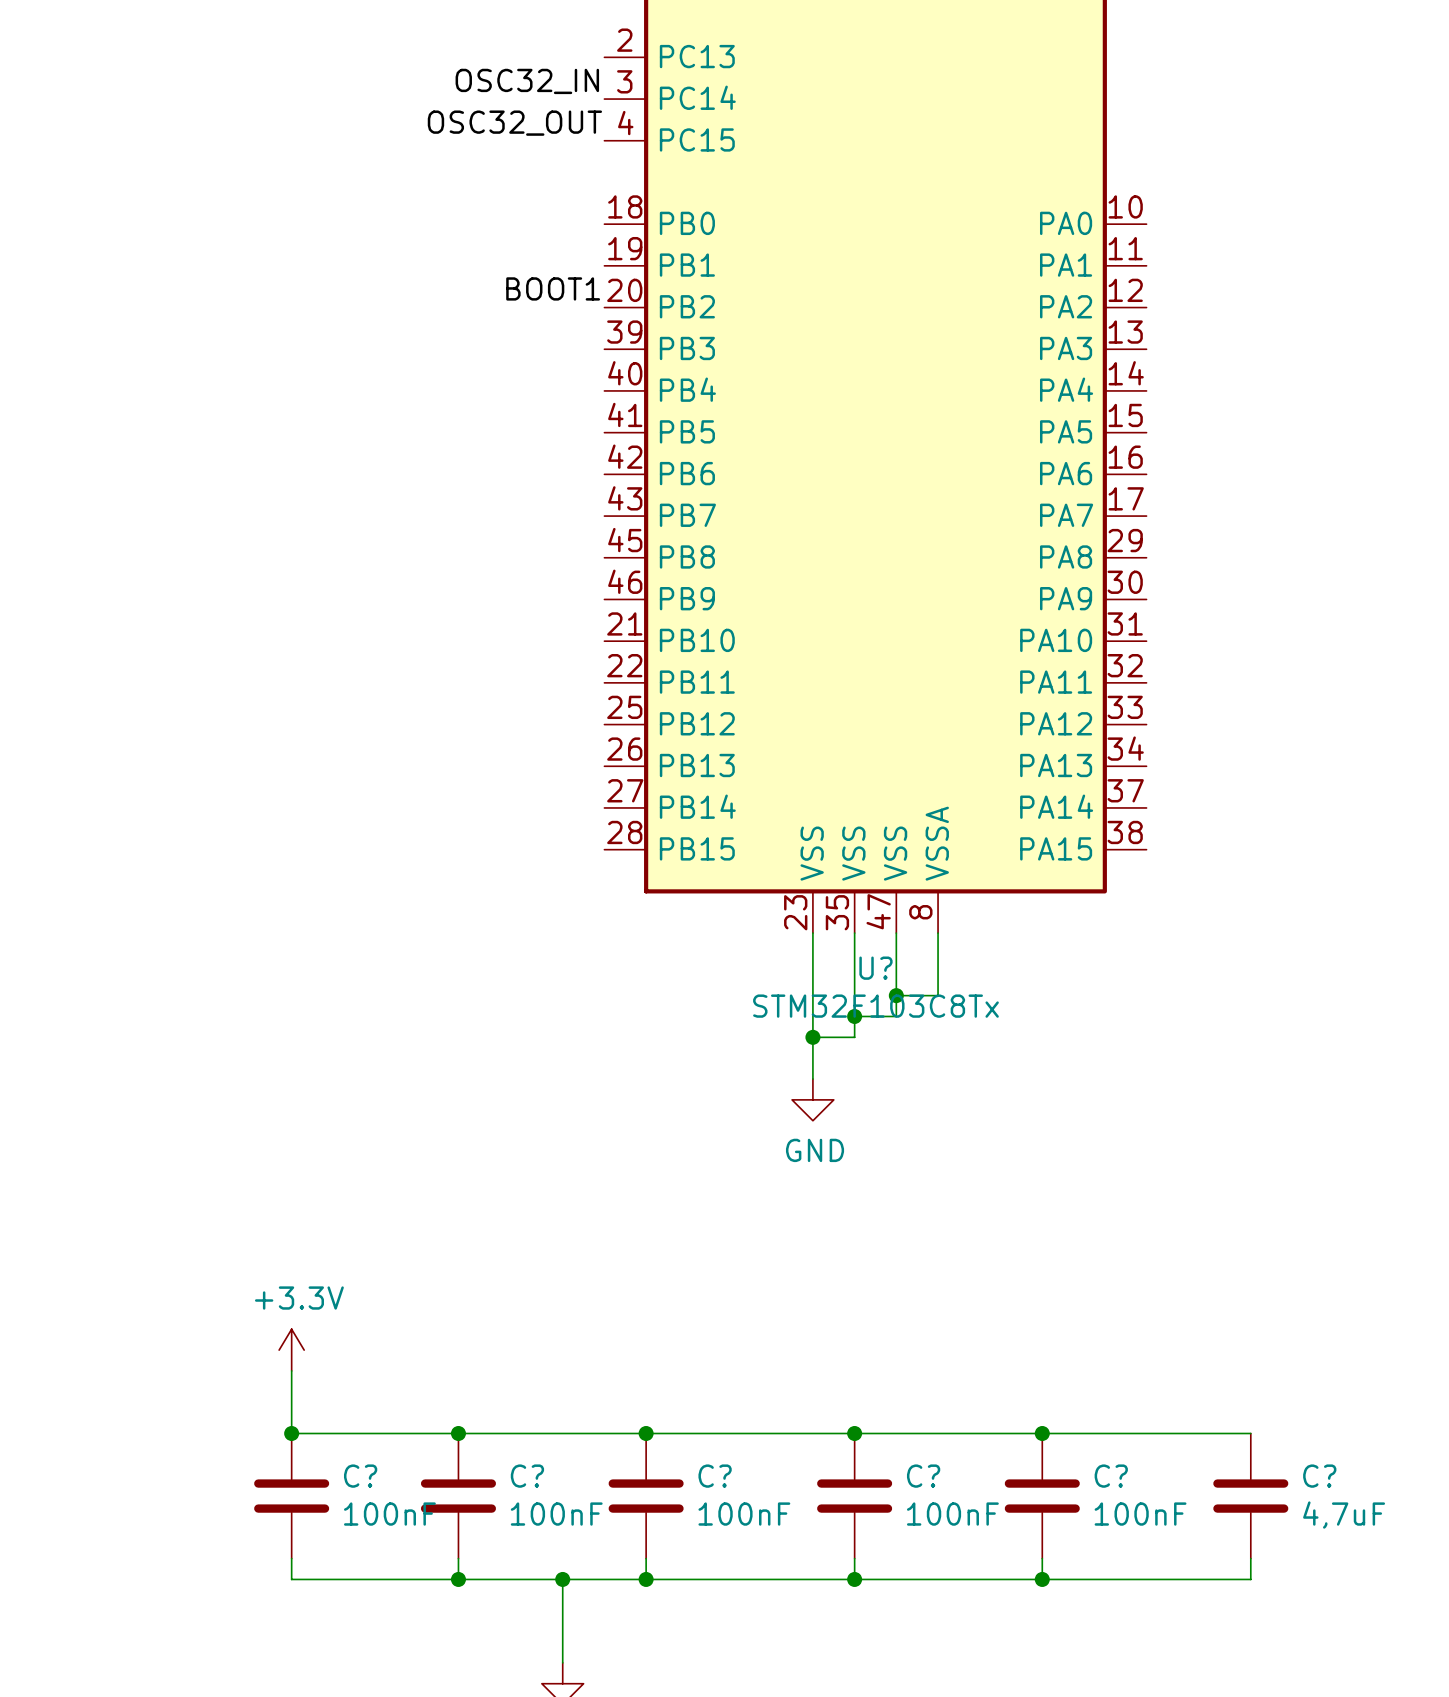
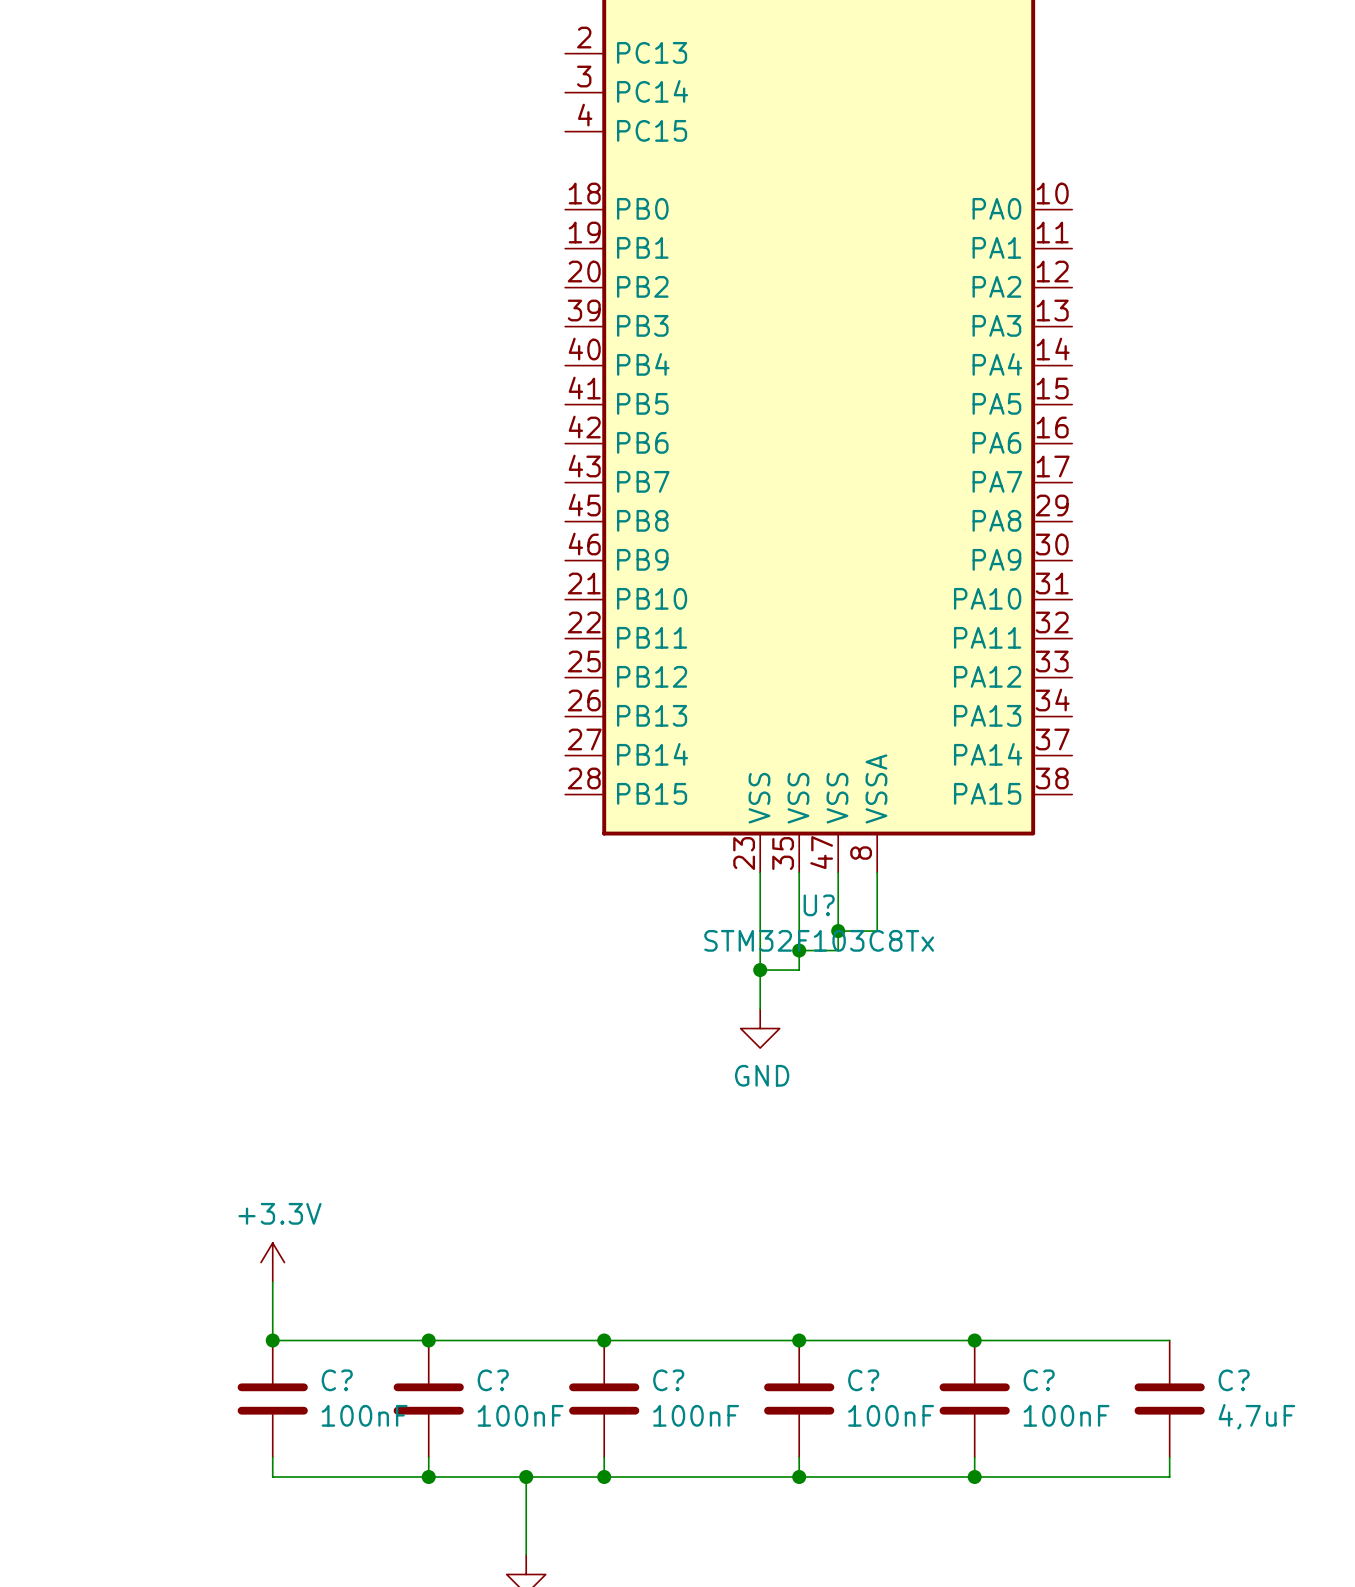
label: OSC32_IN (527, 81) -> none
label: OSC32_OUT (514, 123) -> none
label: BOOT1 (553, 288) -> none

